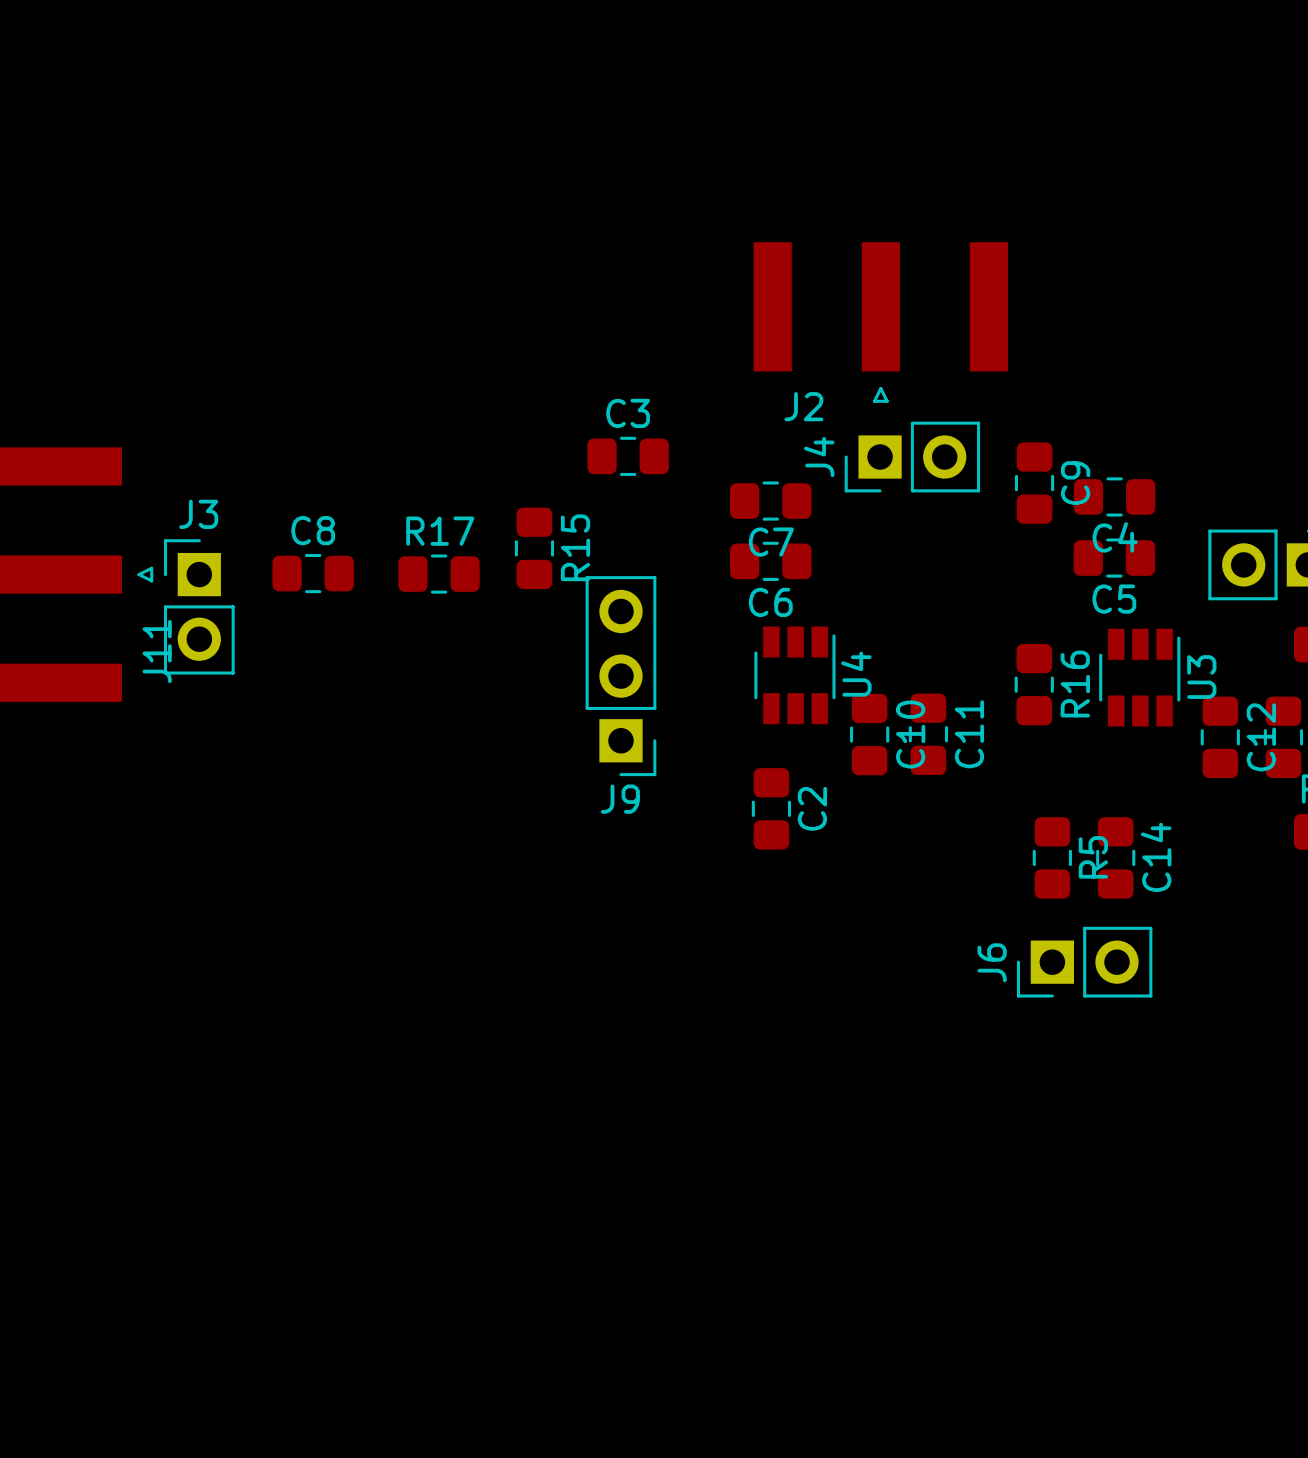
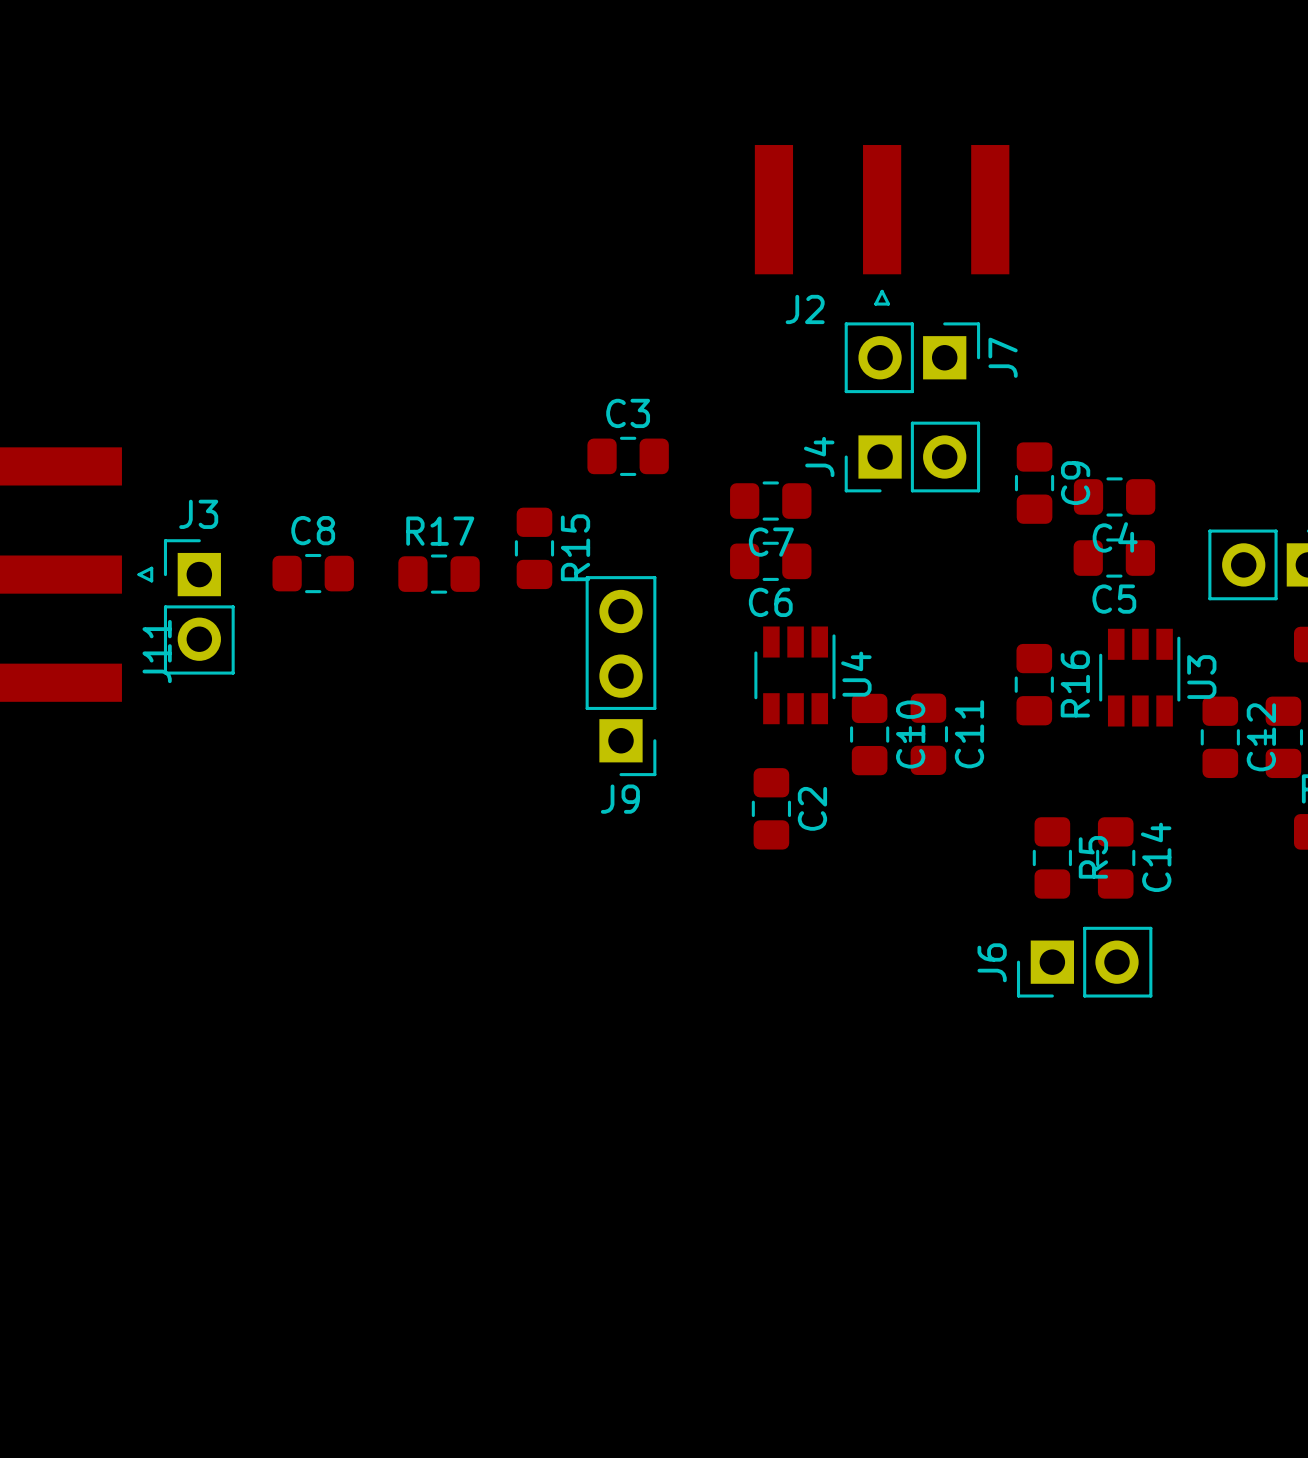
J2 position: (880, 322) -> (882, 225)
J7: none -> (912, 357)

